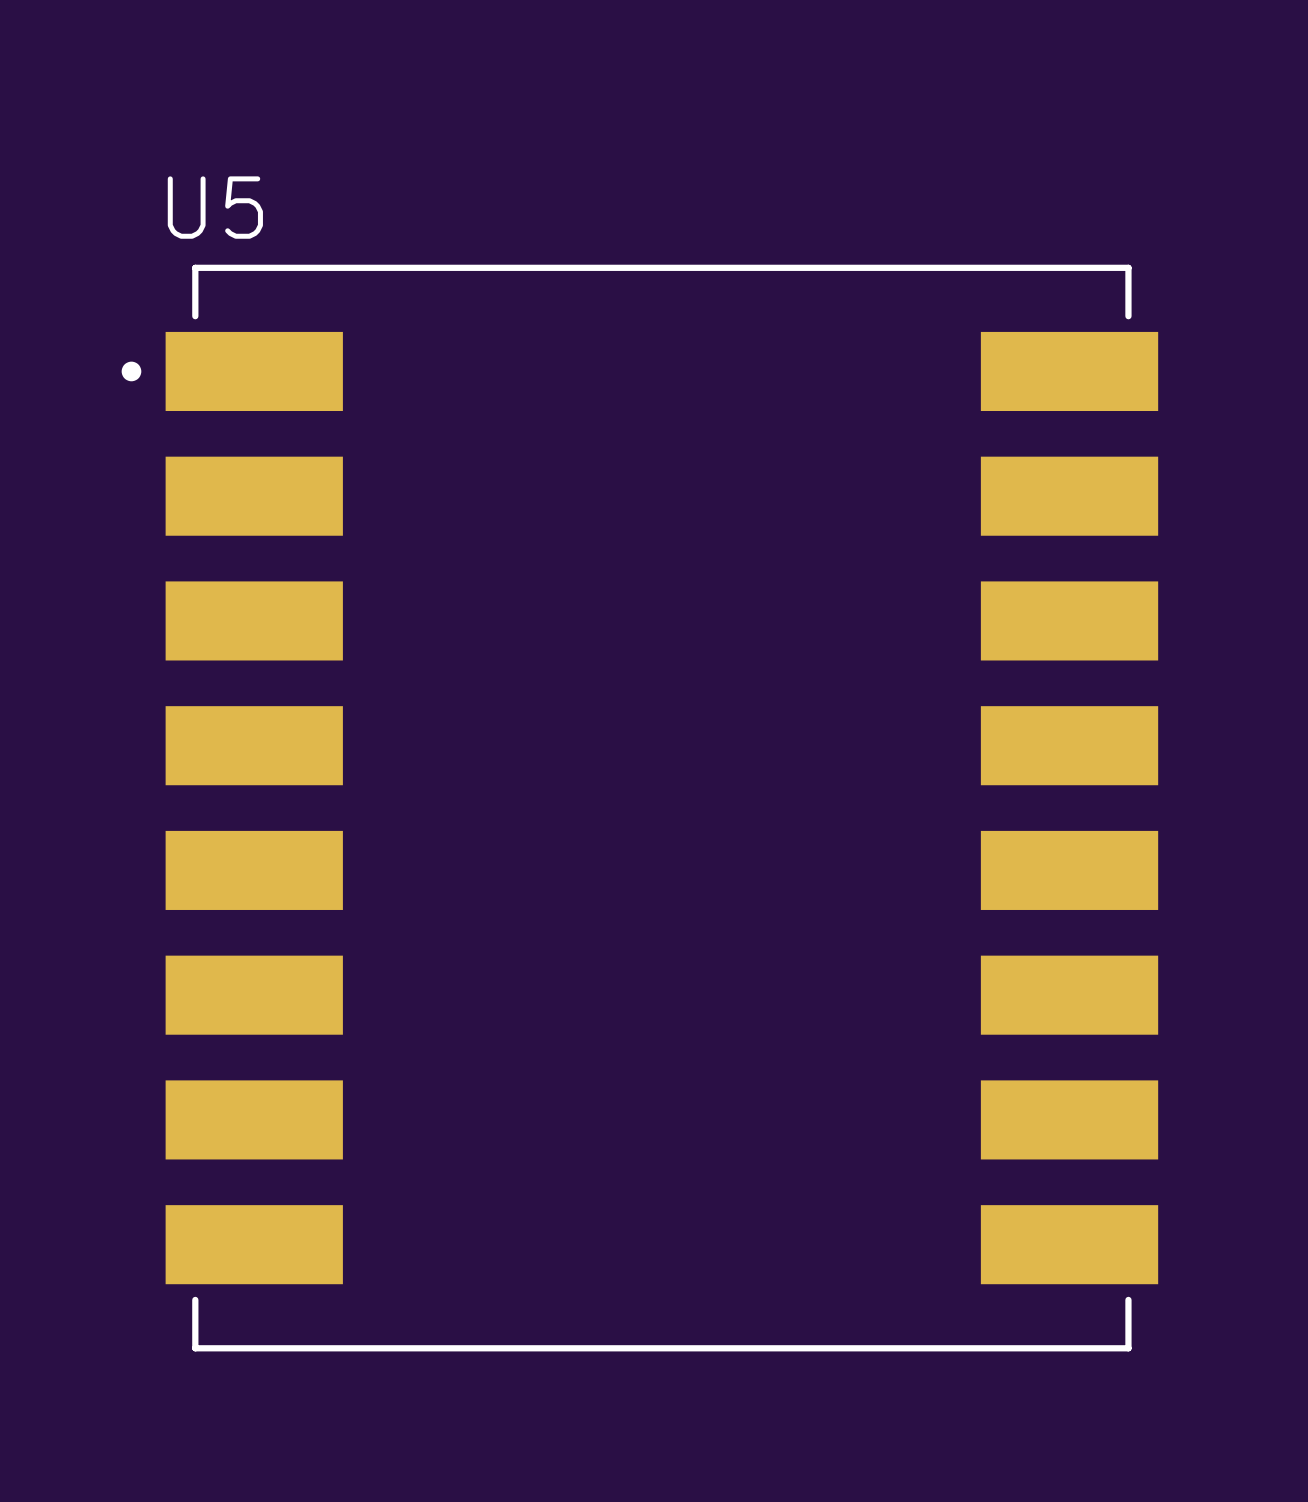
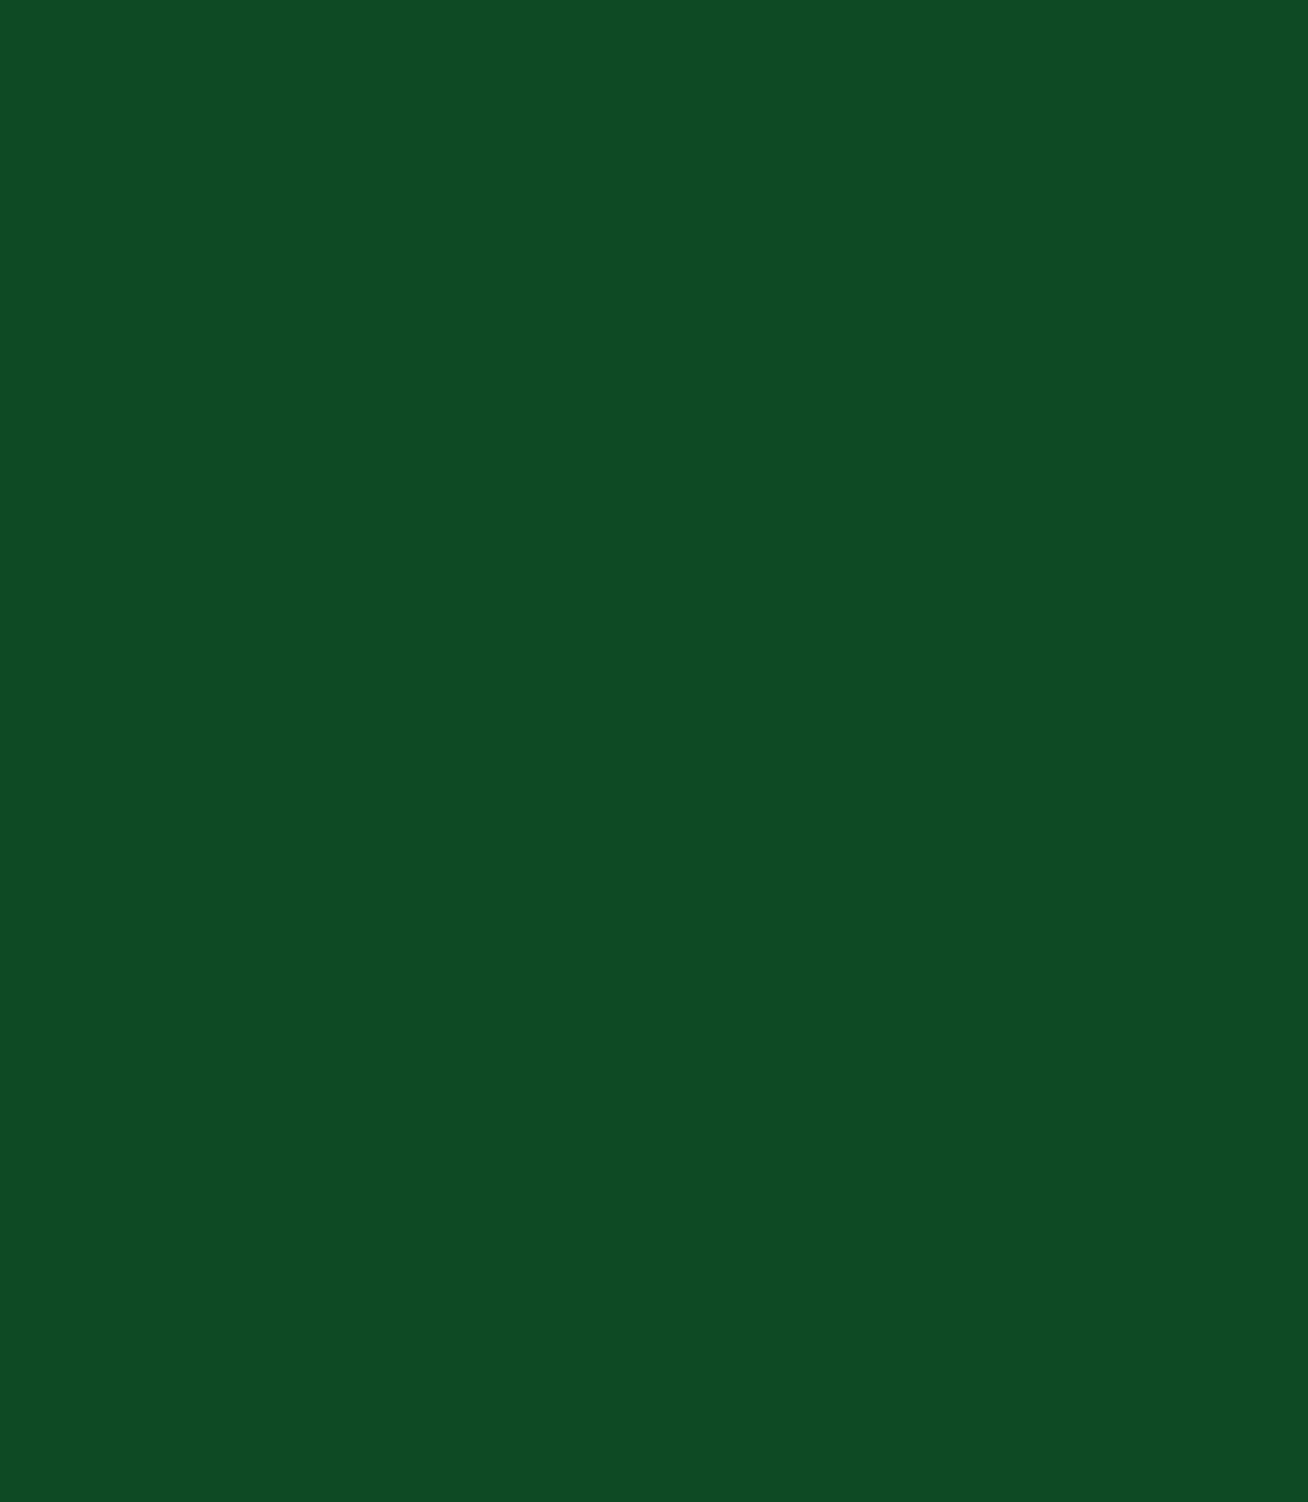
U5: (639, 808) -> none

